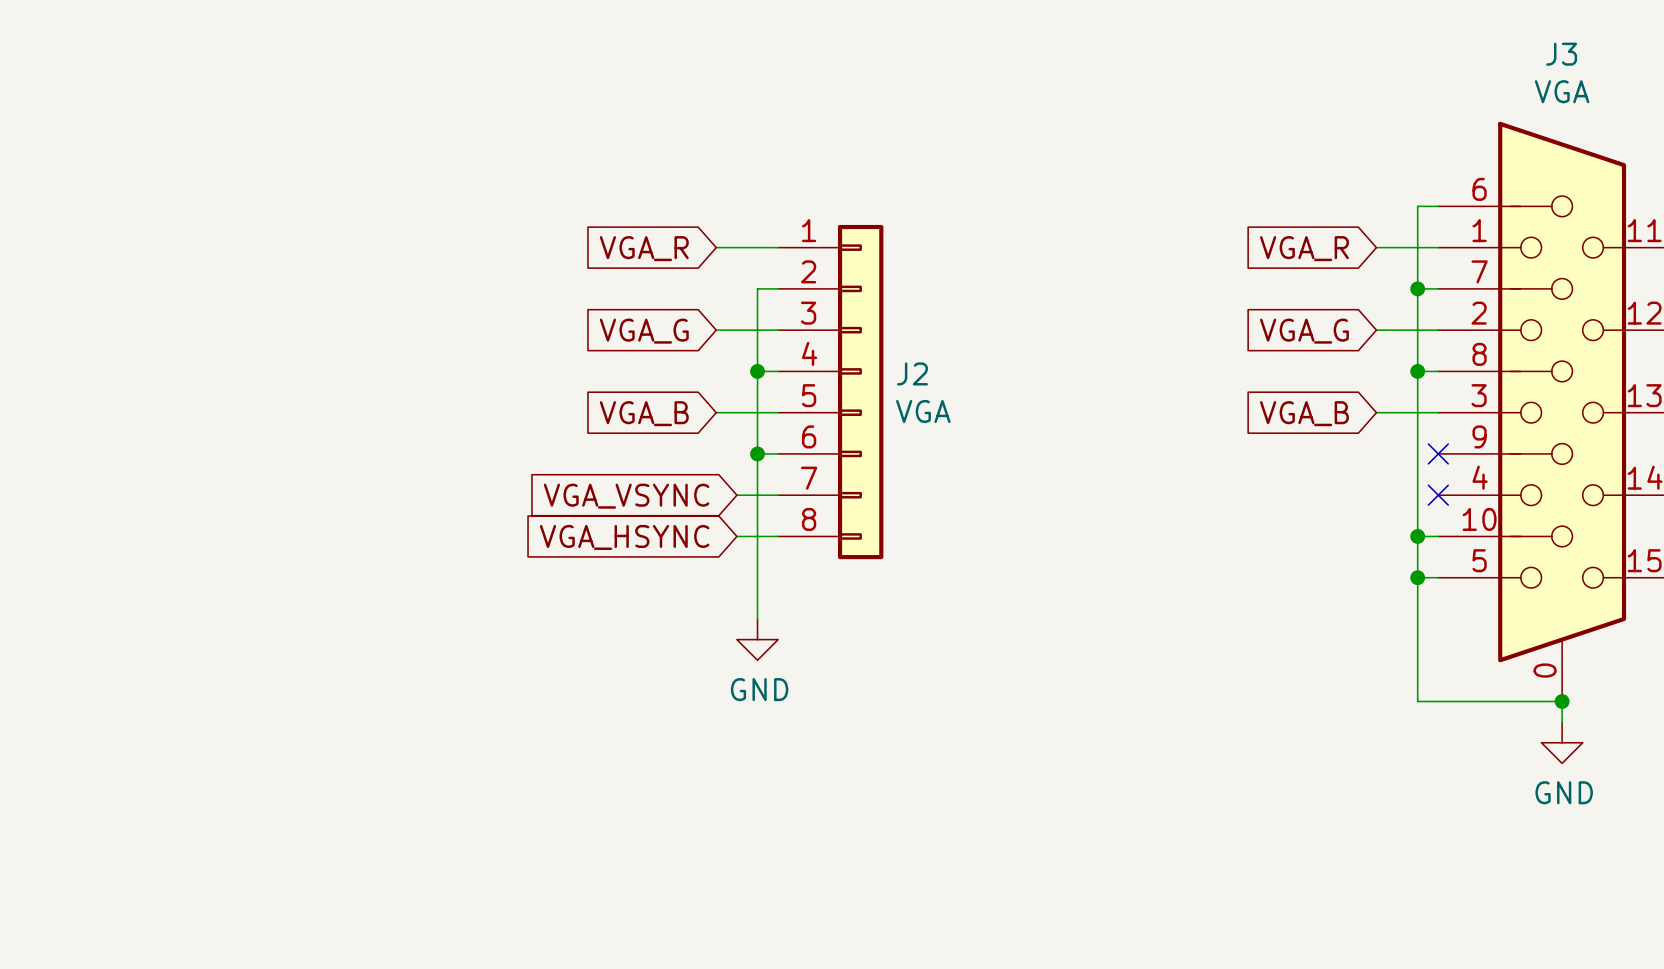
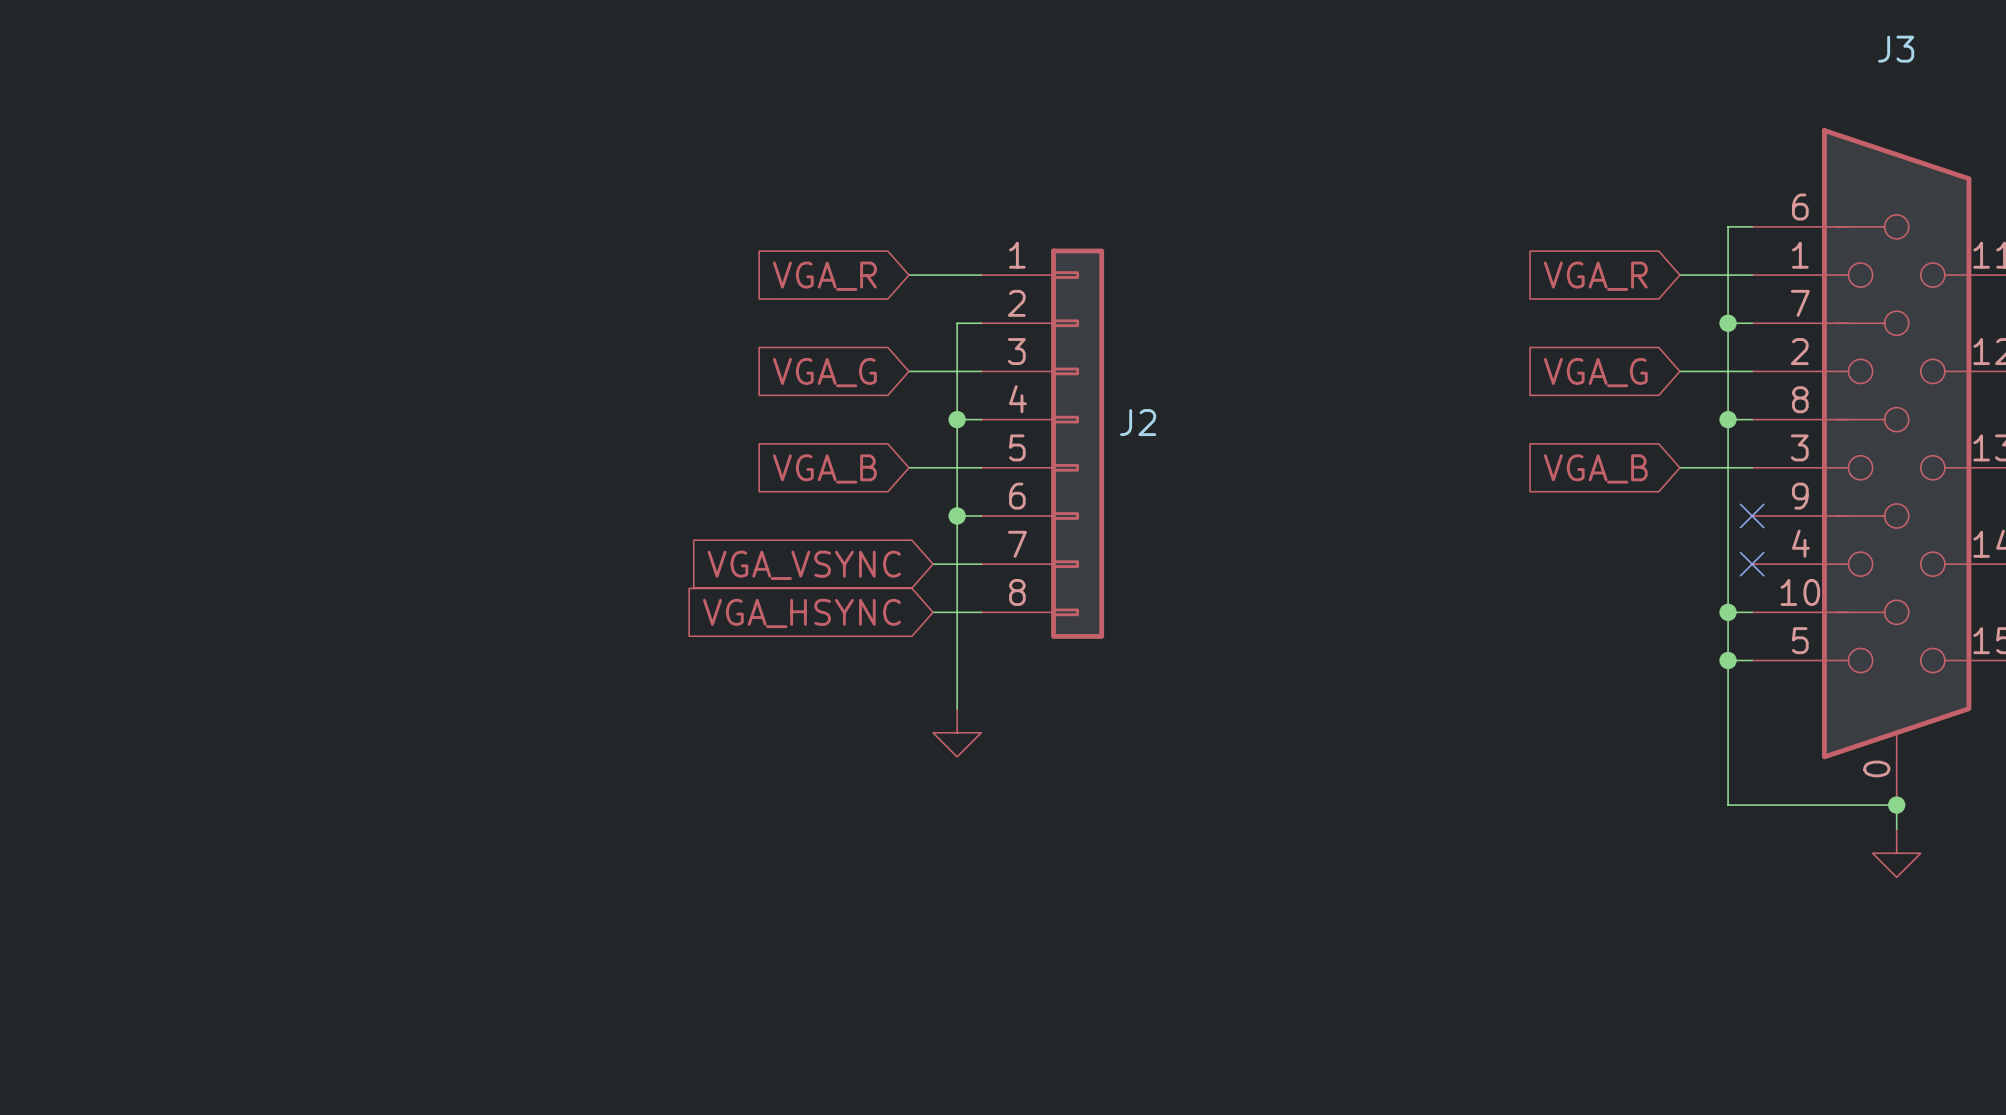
J3 value: VGA (1562, 91) -> none
J2 value: VGA (923, 411) -> none
power symbol text: GND (759, 689) -> none
power symbol text: GND (1564, 792) -> none

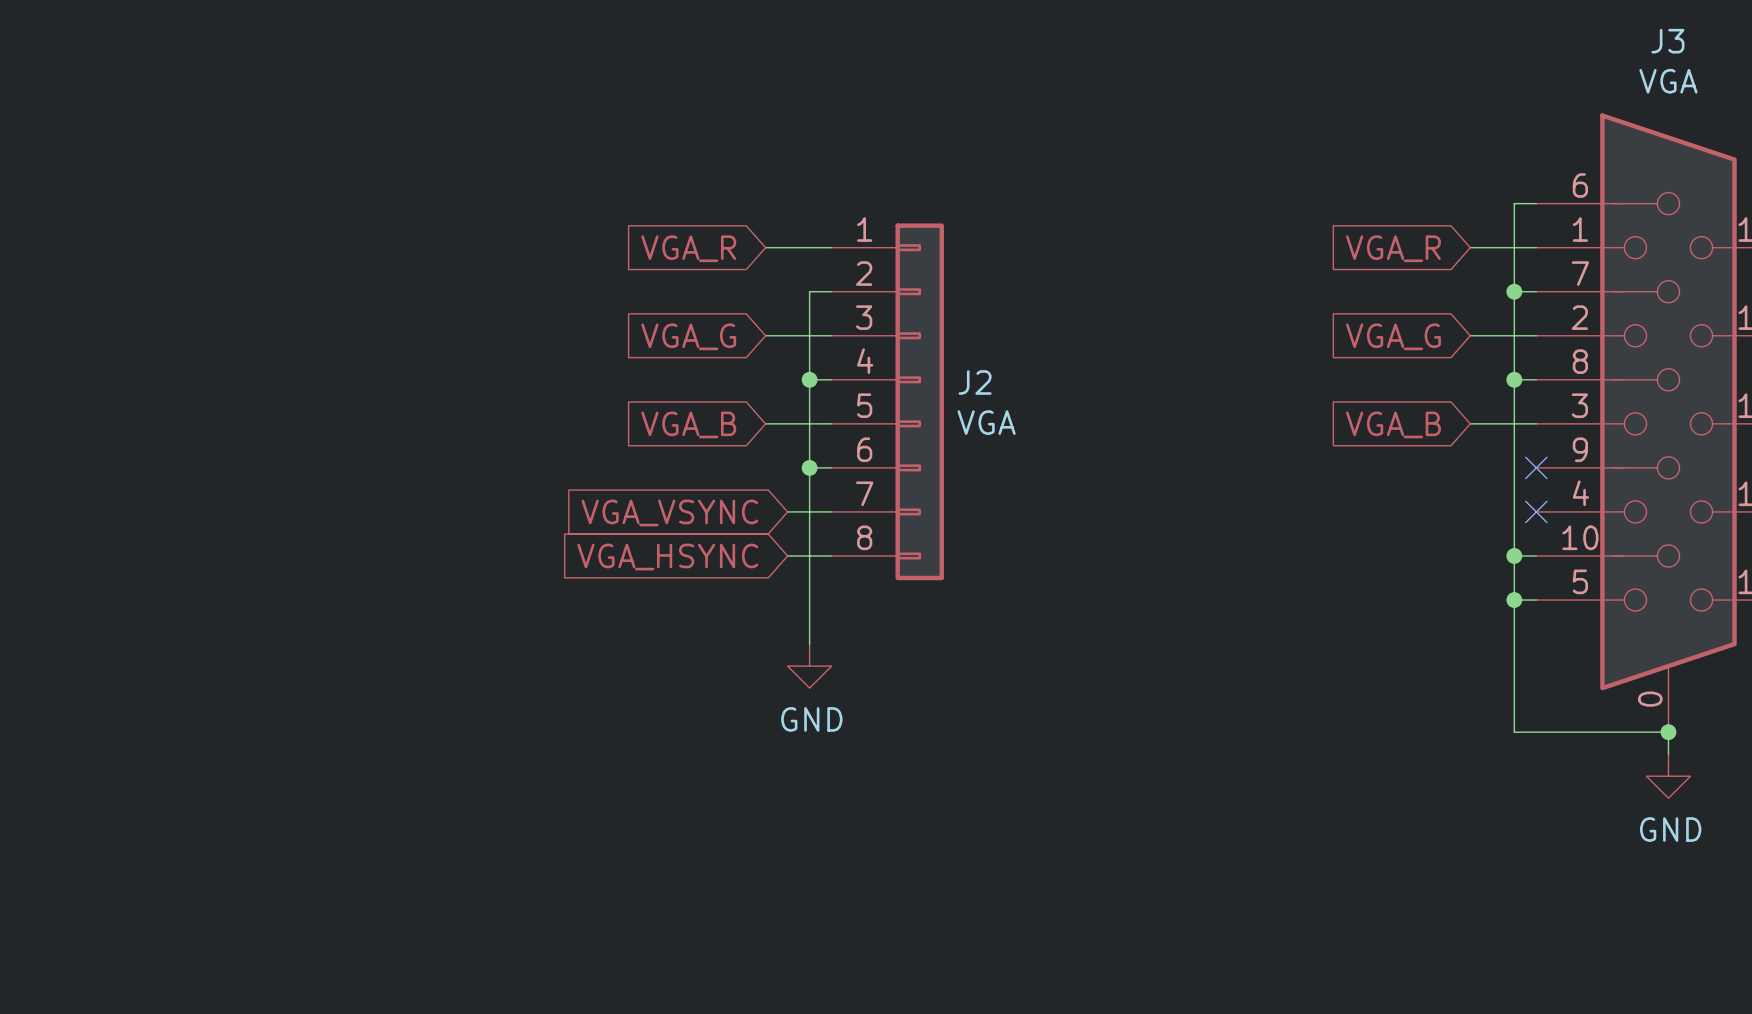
J3 value: none -> VGA (1668, 81)
J2 value: none -> VGA (986, 422)
power symbol text: none -> GND (811, 719)
power symbol text: none -> GND (1670, 829)

